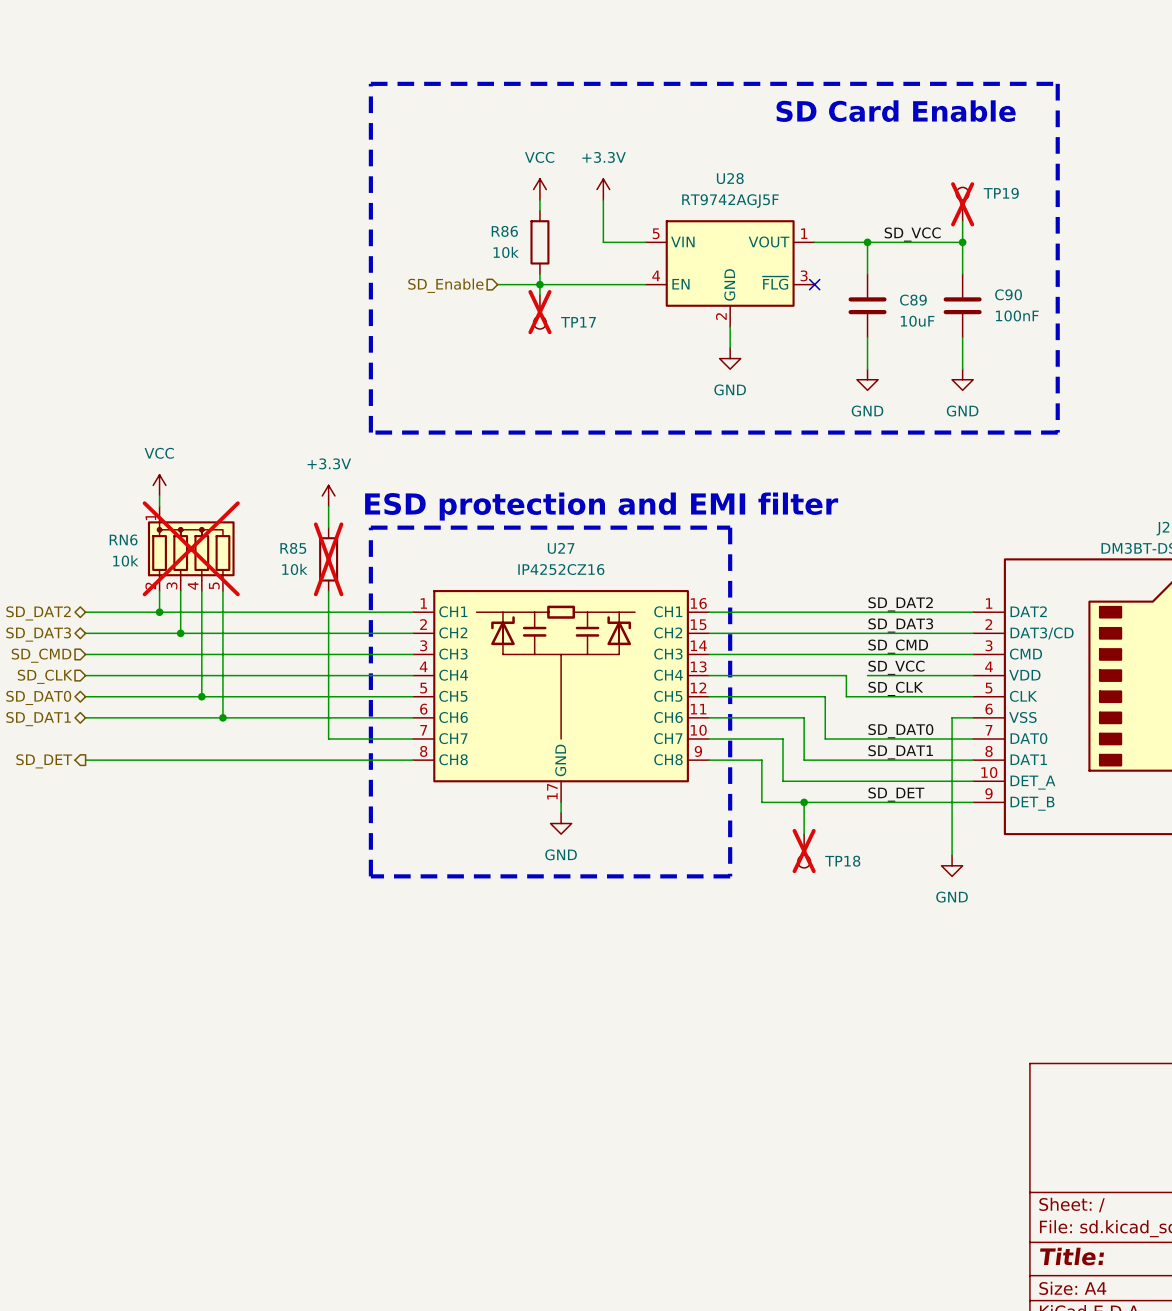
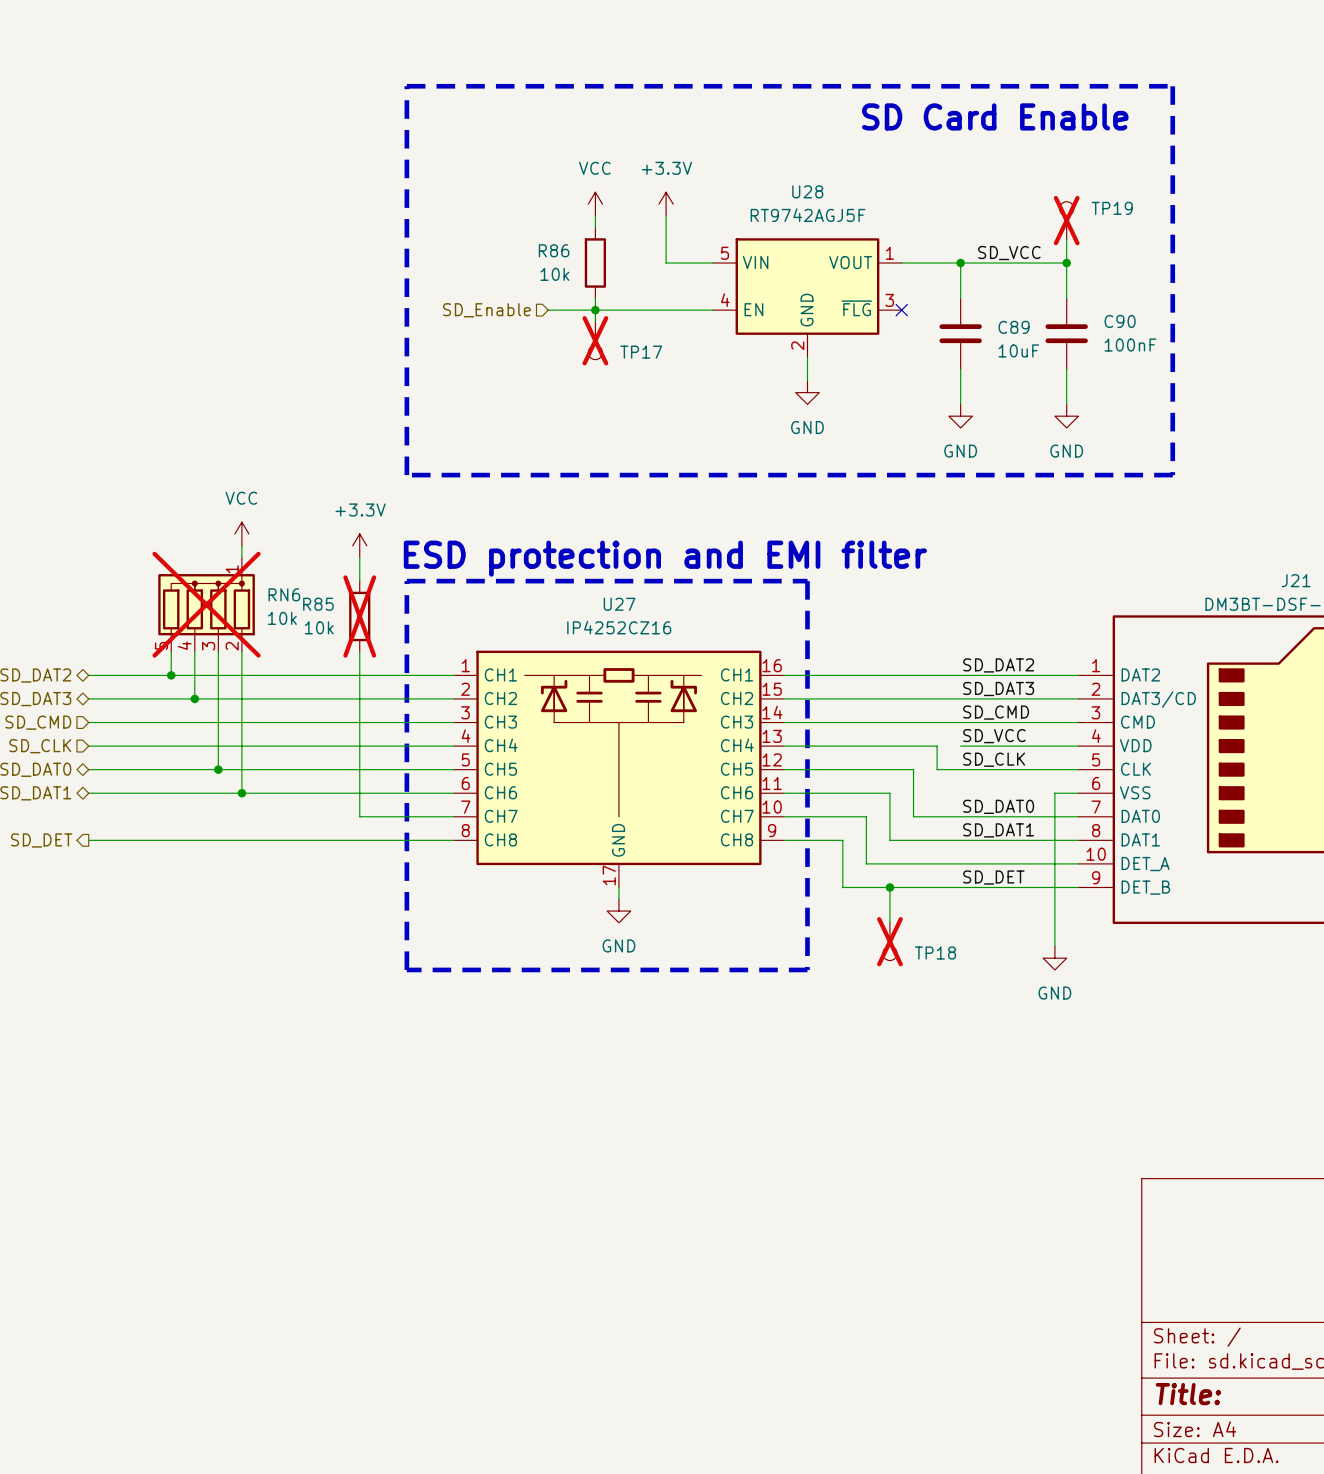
power symbol position: VCC (159, 485) -> VCC (241, 534)
wire: (159, 495) (159, 506) -> (241, 545) (241, 557)
RN6 flip: as is (191, 550) -> left-right (206, 607)

